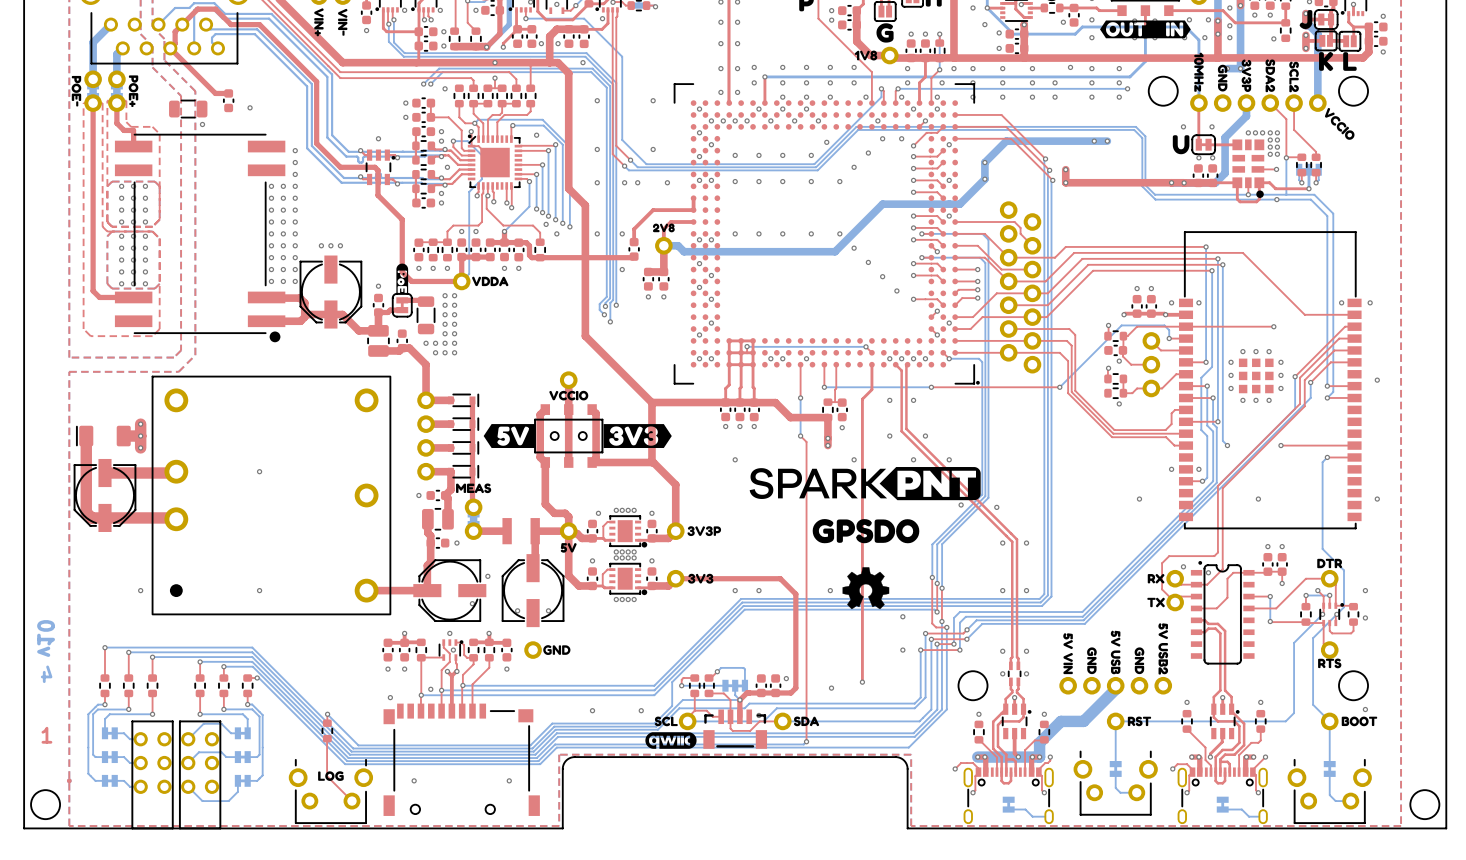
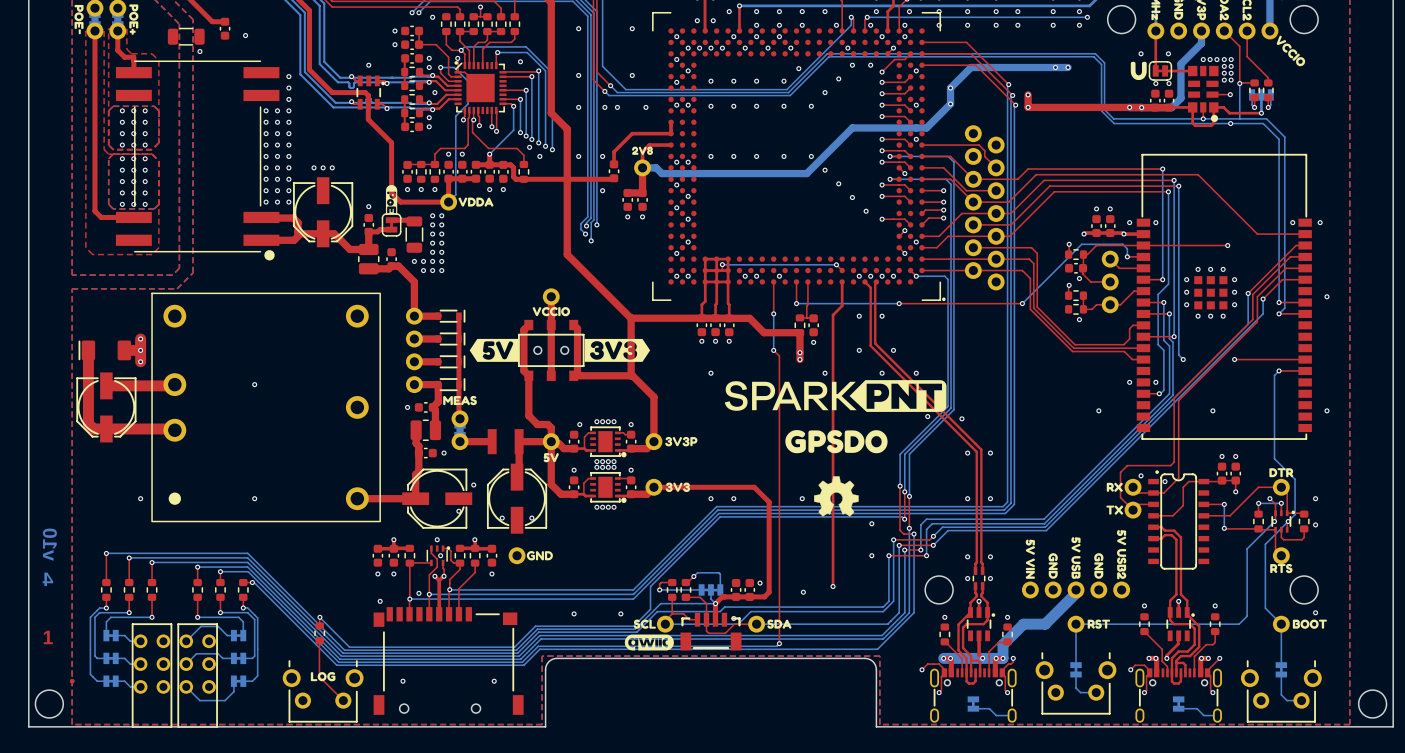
top track: none -> (618, 432) (631, 434)
top track: none -> (618, 478) (629, 478) (631, 480)

